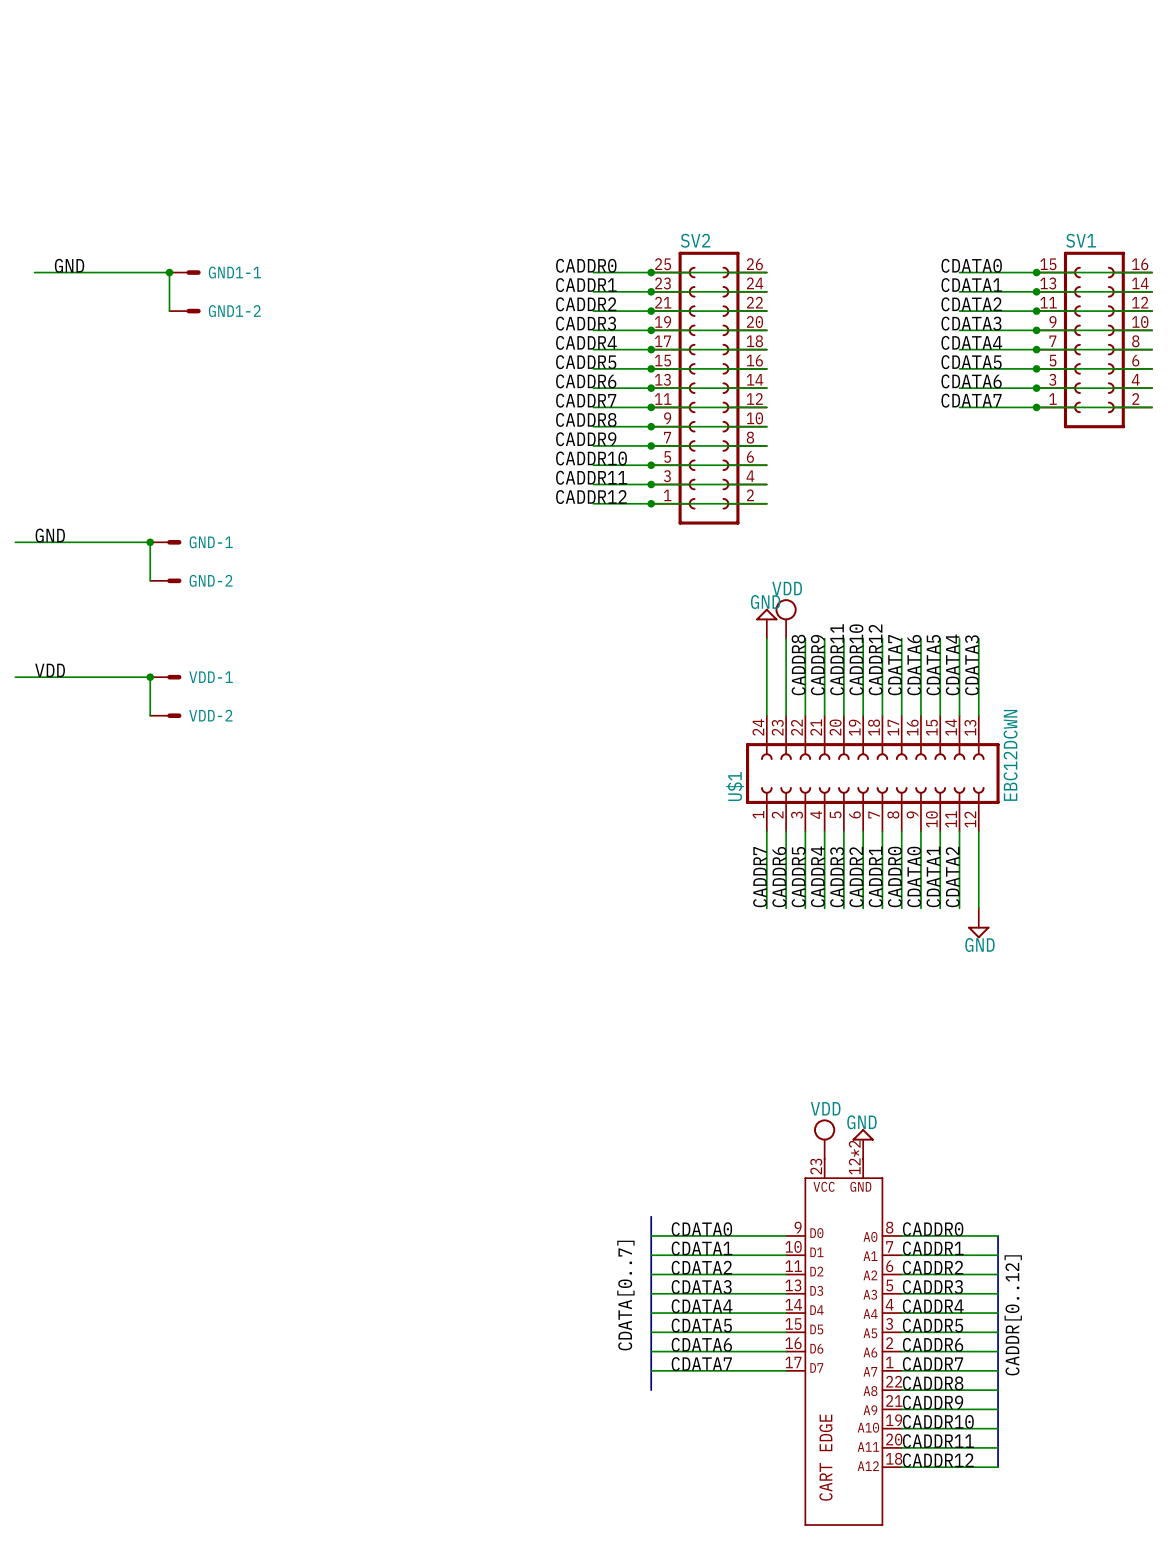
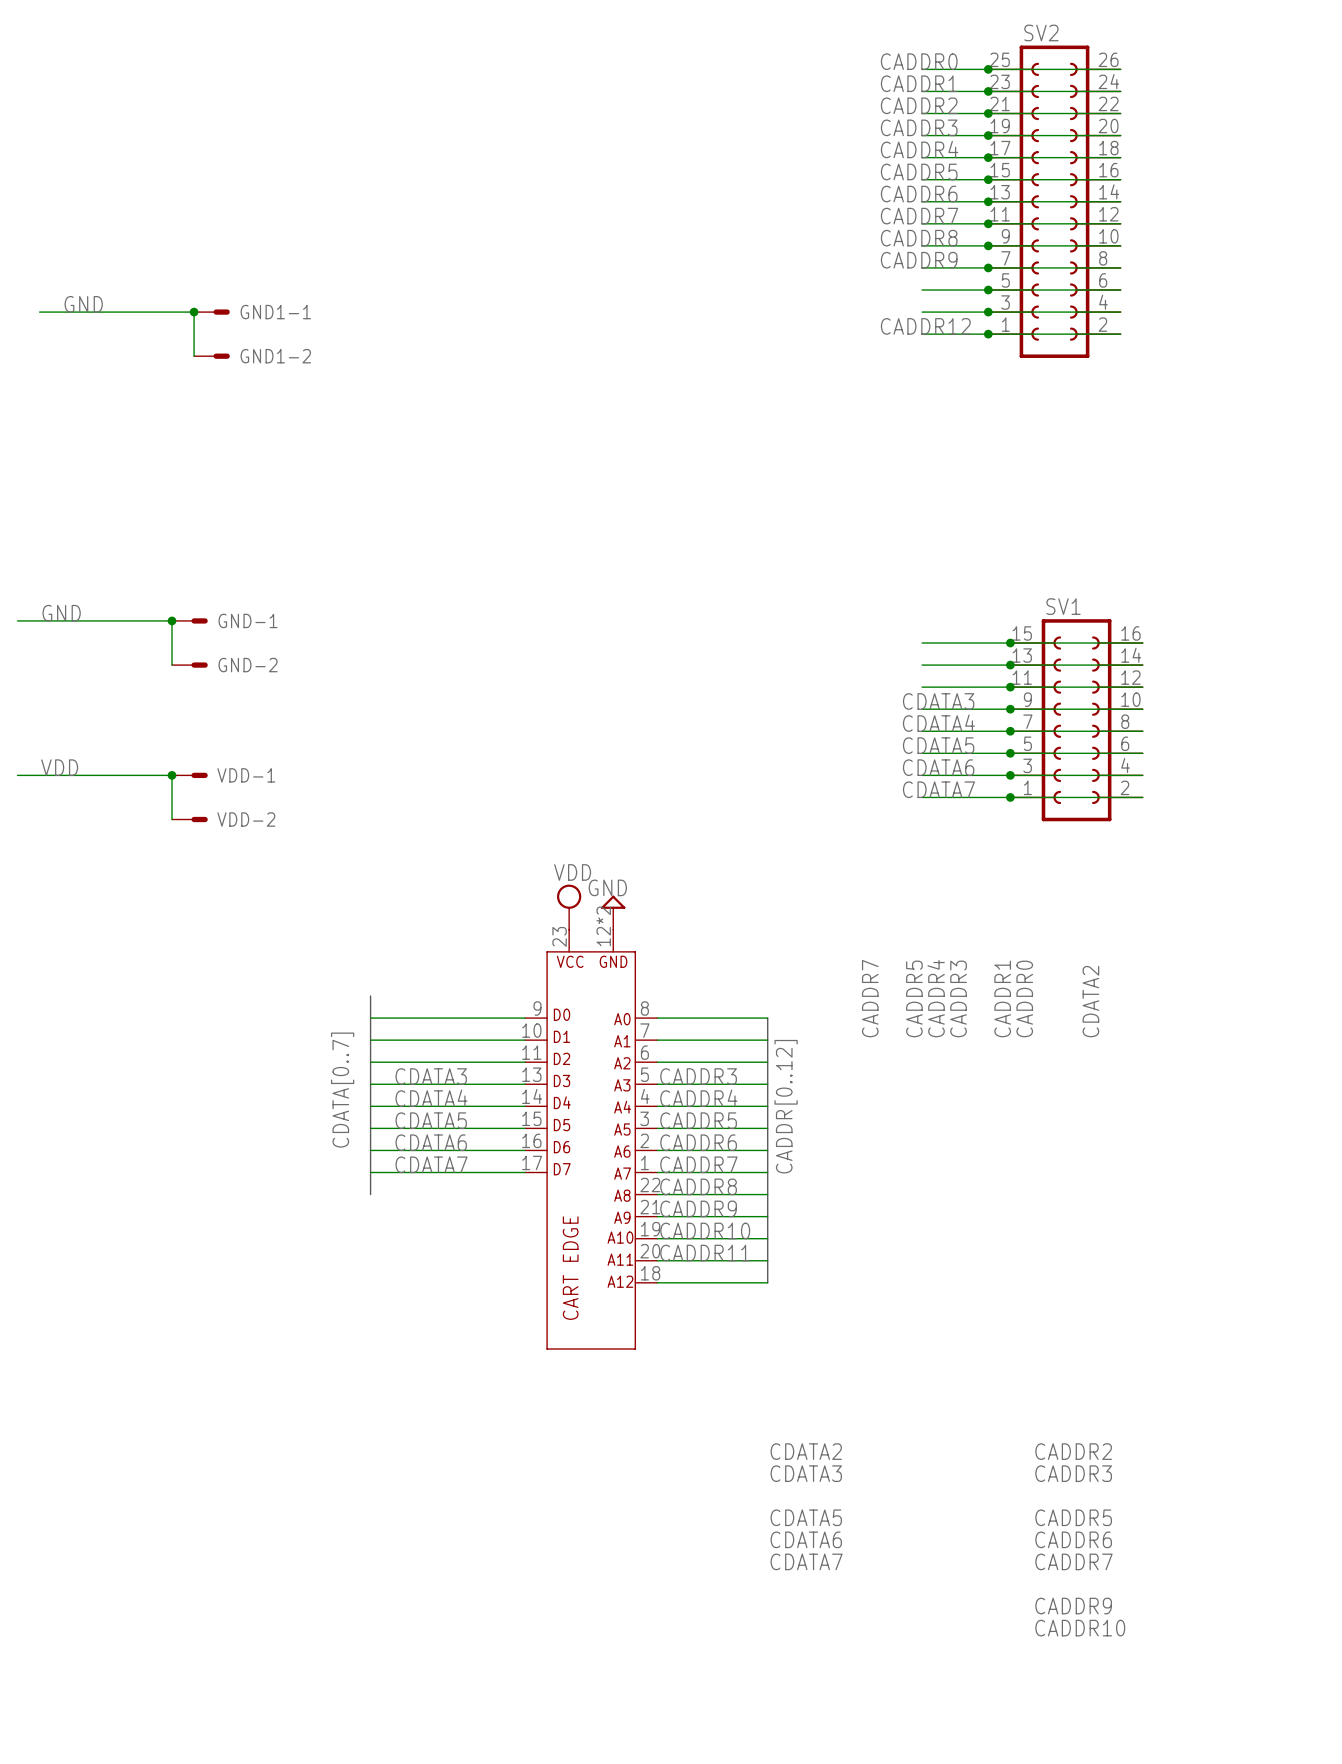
label: none -> CADDR0 (919, 61)
wire: none -> (922, 69) (1120, 69)
junction: none -> (988, 69)
label: none -> CADDR1 (919, 83)
wire: none -> (922, 91) (1120, 91)
junction: none -> (988, 91)
label: none -> CADDR2 (919, 105)
wire: none -> (922, 113) (1120, 113)
junction: none -> (988, 113)
label: none -> CADDR3 (919, 127)
wire: none -> (922, 135) (1120, 135)
junction: none -> (988, 135)
label: none -> CADDR4 (919, 149)
wire: none -> (922, 157) (1120, 157)
junction: none -> (988, 157)
label: none -> CADDR5 (919, 171)
wire: none -> (922, 179) (1120, 179)
junction: none -> (988, 179)
label: none -> CADDR6 (919, 194)
wire: none -> (922, 201) (1120, 201)
junction: none -> (988, 201)
label: none -> CADDR7 (919, 216)
wire: none -> (922, 223) (1120, 223)
junction: none -> (988, 223)
label: none -> CADDR8 (919, 238)
wire: none -> (922, 245) (1120, 245)
junction: none -> (988, 245)
label: none -> CADDR9 (919, 260)
junction: none -> (988, 267)
junction: none -> (988, 290)
label: CADDR0 (586, 265) -> none
label: CDATA0 (971, 265) -> none
wire: (593, 272) (766, 272) -> none
junction: (651, 272) -> none
wire: none -> (922, 312) (1098, 312)
junction: none -> (988, 312)
wire: (978, 272) (1152, 272) -> (922, 267) (1120, 267)
junction: (1036, 272) -> none
label: CADDR1 (586, 285) -> none
label: none -> CADDR12 (925, 326)
label: CDATA1 (971, 285) -> none
wire: (593, 291) (766, 291) -> none
junction: (651, 291) -> none
wire: none -> (922, 334) (1098, 334)
junction: none -> (988, 334)
wire: (978, 291) (1152, 291) -> (922, 290) (1120, 290)
junction: (1036, 291) -> none
label: CADDR2 (586, 304) -> none
label: CDATA2 (971, 304) -> none
wire: (593, 311) (766, 311) -> none
junction: (651, 311) -> none
wire: (959, 311) (1152, 311) -> none
junction: (1036, 311) -> none
label: CADDR3 (586, 323) -> none
label: CDATA3 (971, 323) -> none
wire: (593, 330) (766, 330) -> none
junction: (651, 330) -> none
wire: (959, 330) (1152, 330) -> none
junction: (1036, 330) -> none
SV1 position: (1094, 339) -> (1076, 720)
label: CADDR4 (586, 342) -> none
label: CDATA4 (971, 342) -> none
wire: (593, 349) (766, 349) -> none
junction: (651, 349) -> none
wire: (959, 349) (1152, 349) -> none
junction: (1036, 349) -> none
label: CADDR5 (586, 362) -> none
label: CDATA5 (971, 362) -> none
wire: (593, 368) (766, 368) -> none
junction: (651, 368) -> none
wire: (959, 368) (1152, 368) -> none
junction: (1036, 368) -> none
label: CADDR6 (586, 381) -> none
label: CDATA6 (971, 381) -> none
wire: (593, 388) (766, 388) -> none
junction: (651, 388) -> none
SV2 position: (709, 388) -> (1054, 201)
wire: (959, 388) (1152, 388) -> none
junction: (1036, 388) -> none
label: CADDR7 (586, 400) -> none
label: CDATA7 (971, 400) -> none
wire: (593, 407) (766, 407) -> none
junction: (651, 407) -> none
wire: (959, 407) (1152, 407) -> none
junction: (1036, 407) -> none
label: CADDR8 (586, 419) -> none
wire: (593, 426) (766, 426) -> none
junction: (651, 426) -> none
label: CADDR9 (586, 439) -> none
wire: (593, 445) (766, 445) -> none
junction: (651, 445) -> none
label: CADDR10 (591, 458) -> none
wire: (593, 465) (766, 465) -> none
junction: (651, 465) -> none
label: CADDR11 (591, 477) -> none
wire: (593, 484) (766, 484) -> none
junction: (651, 484) -> none
label: CADDR12 (591, 497) -> none
wire: (593, 503) (766, 503) -> none
junction: (651, 503) -> none
wire: none -> (922, 643) (1142, 643)
junction: none -> (1010, 643)
wire: none -> (922, 665) (1142, 665)
junction: none -> (1010, 665)
wire: none -> (922, 687) (1142, 687)
junction: none -> (1010, 687)
label: none -> CDATA3 (938, 701)
power symbol: VDD (786, 618) -> none
wire: none -> (922, 709) (1142, 709)
junction: none -> (1010, 709)
power symbol: GND (766, 623) -> none
label: none -> CDATA4 (938, 723)
wire: (766, 638) (766, 715) -> none
wire: (786, 638) (786, 715) -> none
wire: (805, 638) (805, 715) -> (922, 731) (1142, 731)
wire: (824, 638) (824, 715) -> none
wire: (843, 638) (843, 715) -> none
wire: (863, 638) (863, 715) -> none
wire: (882, 638) (882, 715) -> none
junction: none -> (1010, 731)
wire: (901, 638) (901, 715) -> none
wire: (920, 638) (920, 715) -> none
wire: (940, 638) (940, 715) -> none
wire: (959, 638) (959, 715) -> none
wire: (978, 638) (978, 715) -> none
wire: none -> (922, 753) (1142, 753)
junction: none -> (1010, 753)
label: CADDR11 (837, 659) -> none
label: CADDR10 (856, 659) -> none
label: CADDR12 (875, 659) -> none
label: CDATA4 (952, 664) -> none
label: CADDR8 (798, 665) -> none
label: CADDR9 (817, 665) -> none
label rotation: 0° (894, 665) -> 90° clockwise (938, 789)
label rotation: 0° (914, 665) -> 90° clockwise (938, 767)
label position: CDATA6 (914, 665) -> CDATA6 (938, 767)
label rotation: 0° (933, 665) -> 90° clockwise (938, 745)
label position: CDATA5 (933, 665) -> CDATA5 (938, 745)
label: CDATA3 (972, 665) -> none
wire: none -> (922, 775) (1142, 775)
junction: none -> (1010, 775)
wire: none -> (922, 797) (1142, 797)
junction: none -> (1010, 797)
U$1: EBC12DCWN (872, 773) -> none
power symbol: none -> VDD (569, 907)
power symbol: none -> GND (613, 912)
wire: (766, 831) (766, 908) -> none
wire: (786, 831) (786, 908) -> none
wire: (805, 831) (805, 908) -> none
wire: (824, 831) (824, 908) -> none
wire: (843, 831) (843, 908) -> none
wire: (863, 831) (863, 908) -> none
wire: (882, 831) (882, 908) -> none
wire: (901, 831) (901, 908) -> none
wire: (920, 831) (920, 908) -> none
wire: (940, 831) (940, 908) -> none
wire: (959, 831) (959, 908) -> none
wire: (978, 831) (978, 908) -> none
bus: none -> (370, 996) (370, 1194)
label: CDATA0 (914, 876) -> none
label: CDATA1 (933, 876) -> none
label: CADDR6 (779, 877) -> none
label: CADDR2 (856, 877) -> none
wire: none -> (370, 1018) (525, 1018)
wire: none -> (657, 1018) (767, 1018)
bus: none -> (767, 1018) (767, 1282)
wire: none -> (370, 1040) (525, 1040)
wire: none -> (657, 1040) (767, 1040)
power symbol: GND (978, 923) -> none
wire: none -> (370, 1062) (525, 1062)
wire: none -> (657, 1062) (767, 1062)
label: none -> CDATA3 (431, 1076)
label: none -> CADDR3 (698, 1076)
wire: none -> (370, 1084) (525, 1084)
wire: none -> (657, 1084) (767, 1084)
label: none -> CDATA[0..7] (342, 1090)
label: none -> CDATA4 (431, 1098)
label: none -> CADDR4 (698, 1098)
wire: none -> (370, 1106) (525, 1106)
wire: none -> (657, 1106) (767, 1106)
label: none -> CADDR[0..12] (786, 1106)
label: none -> CDATA5 (431, 1120)
label: none -> CADDR5 (698, 1120)
wire: none -> (370, 1128) (525, 1128)
wire: none -> (657, 1128) (767, 1128)
part: none -> (591, 1139)
label: none -> CDATA6 (431, 1142)
label: none -> CADDR6 (698, 1142)
wire: none -> (370, 1150) (525, 1150)
wire: none -> (657, 1150) (767, 1150)
label: none -> CDATA7 (431, 1164)
label: none -> CADDR7 (698, 1164)
wire: none -> (370, 1172) (525, 1172)
wire: none -> (657, 1172) (767, 1172)
label: none -> CADDR8 (698, 1186)
wire: none -> (657, 1194) (767, 1194)
label: none -> CADDR9 (698, 1208)
wire: none -> (657, 1216) (767, 1216)
label: none -> CADDR10 (705, 1230)
wire: none -> (657, 1238) (767, 1238)
label: none -> CADDR11 (705, 1253)
wire: none -> (657, 1260) (767, 1260)
wire: none -> (657, 1282) (767, 1282)
power symbol: VDD (824, 1139) -> none
power symbol: GND (863, 1143) -> none
bus: (651, 1216) (651, 1390) -> none
label: CDATA0 (701, 1229) -> none
label: CADDR0 (933, 1229) -> none
wire: (651, 1235) (786, 1235) -> none
wire: (901, 1235) (998, 1235) -> none
bus: (998, 1235) (998, 1467) -> none
label: CDATA1 (701, 1248) -> none
label: CADDR1 (933, 1248) -> none
wire: (651, 1255) (786, 1255) -> none
wire: (901, 1255) (998, 1255) -> none
wire: (651, 1274) (786, 1274) -> none
wire: (901, 1274) (998, 1274) -> none
wire: (651, 1293) (786, 1293) -> none
wire: (901, 1293) (998, 1293) -> none
label: CDATA[0..7] (625, 1295) -> none
label: CDATA4 (702, 1306) -> none
label: CADDR4 (933, 1306) -> none
wire: (651, 1313) (786, 1313) -> none
wire: (901, 1313) (998, 1313) -> none
label: CADDR[0..12] (1013, 1315) -> none
wire: (651, 1332) (786, 1332) -> none
wire: (901, 1332) (998, 1332) -> none
part: (843, 1342) -> none
wire: (651, 1351) (786, 1351) -> none
wire: (901, 1351) (998, 1351) -> none
wire: (651, 1370) (786, 1370) -> none
wire: (901, 1370) (998, 1370) -> none
label: CADDR8 (933, 1383) -> none
wire: (901, 1390) (998, 1390) -> none
wire: (901, 1409) (998, 1409) -> none
wire: (901, 1428) (998, 1428) -> none
label: CADDR11 (938, 1441) -> none
wire: (901, 1447) (998, 1447) -> none
label: CADDR12 (938, 1460) -> none
wire: (901, 1467) (998, 1467) -> none

